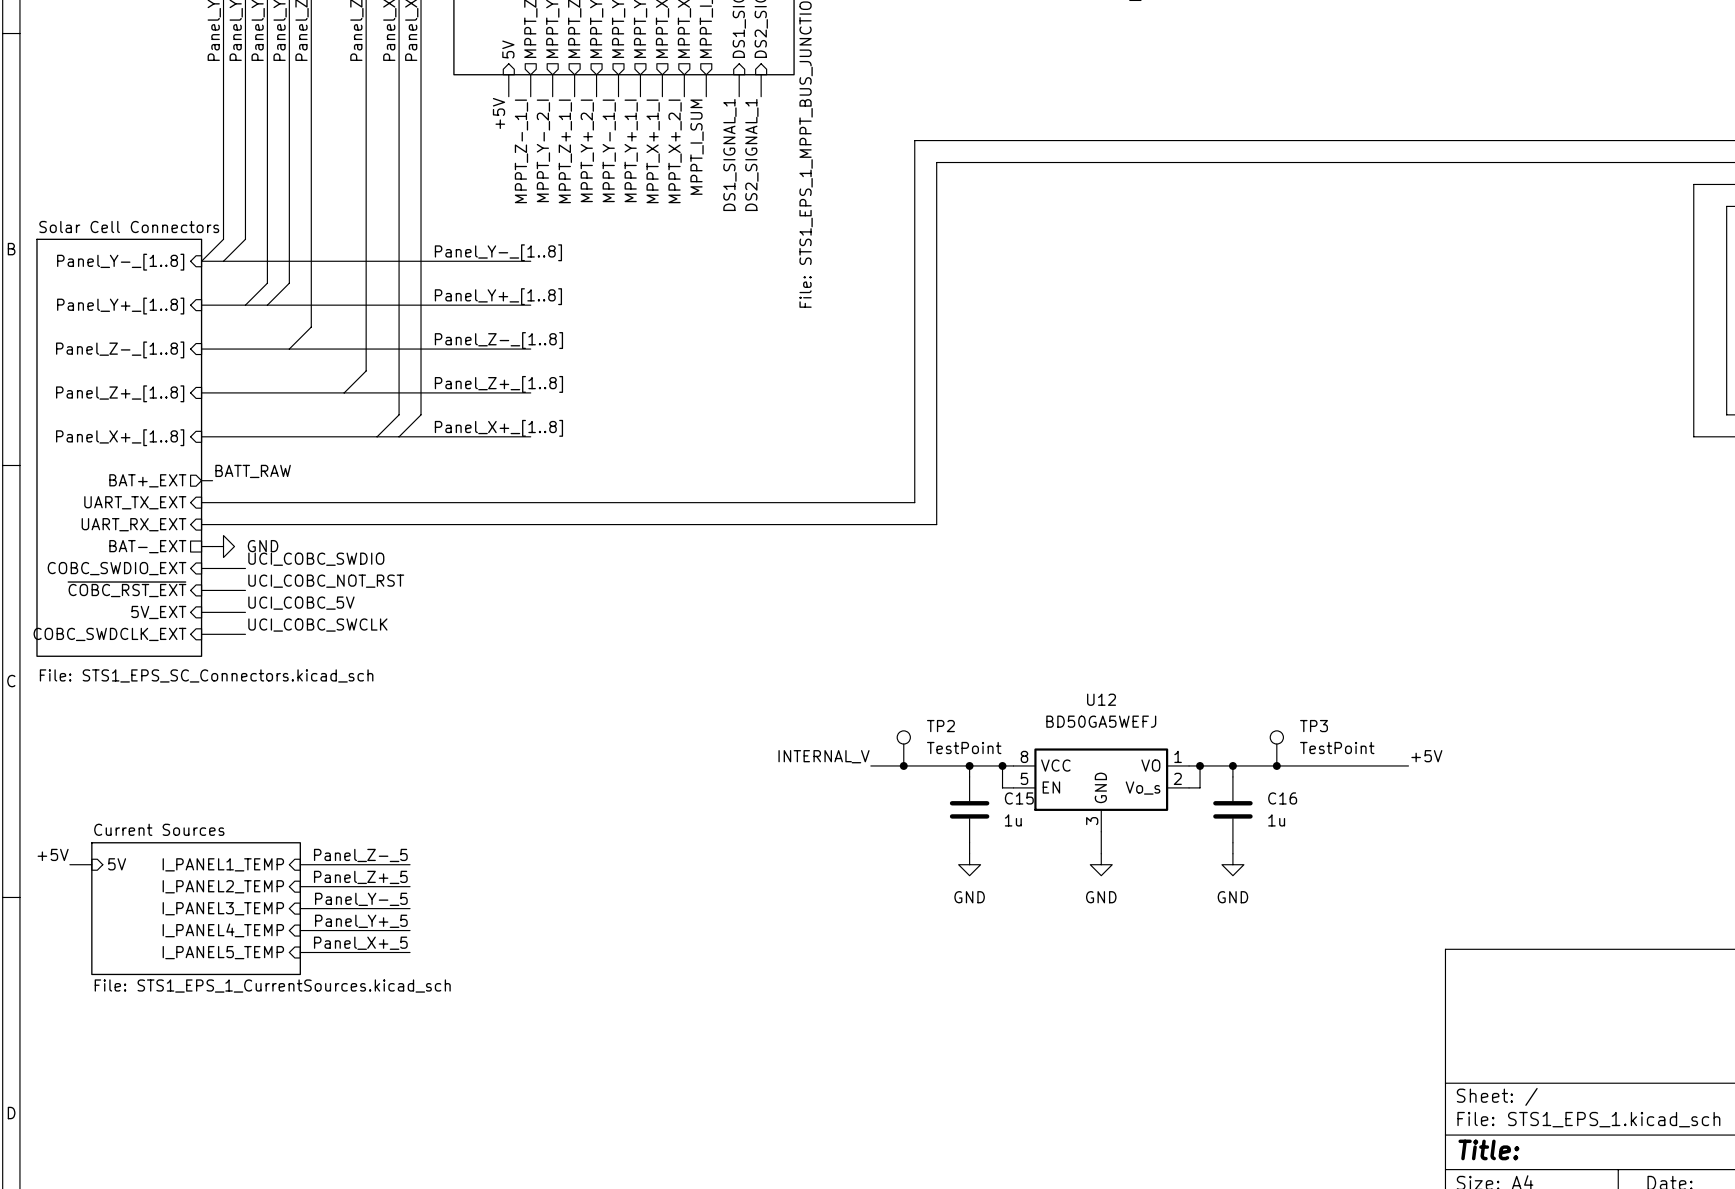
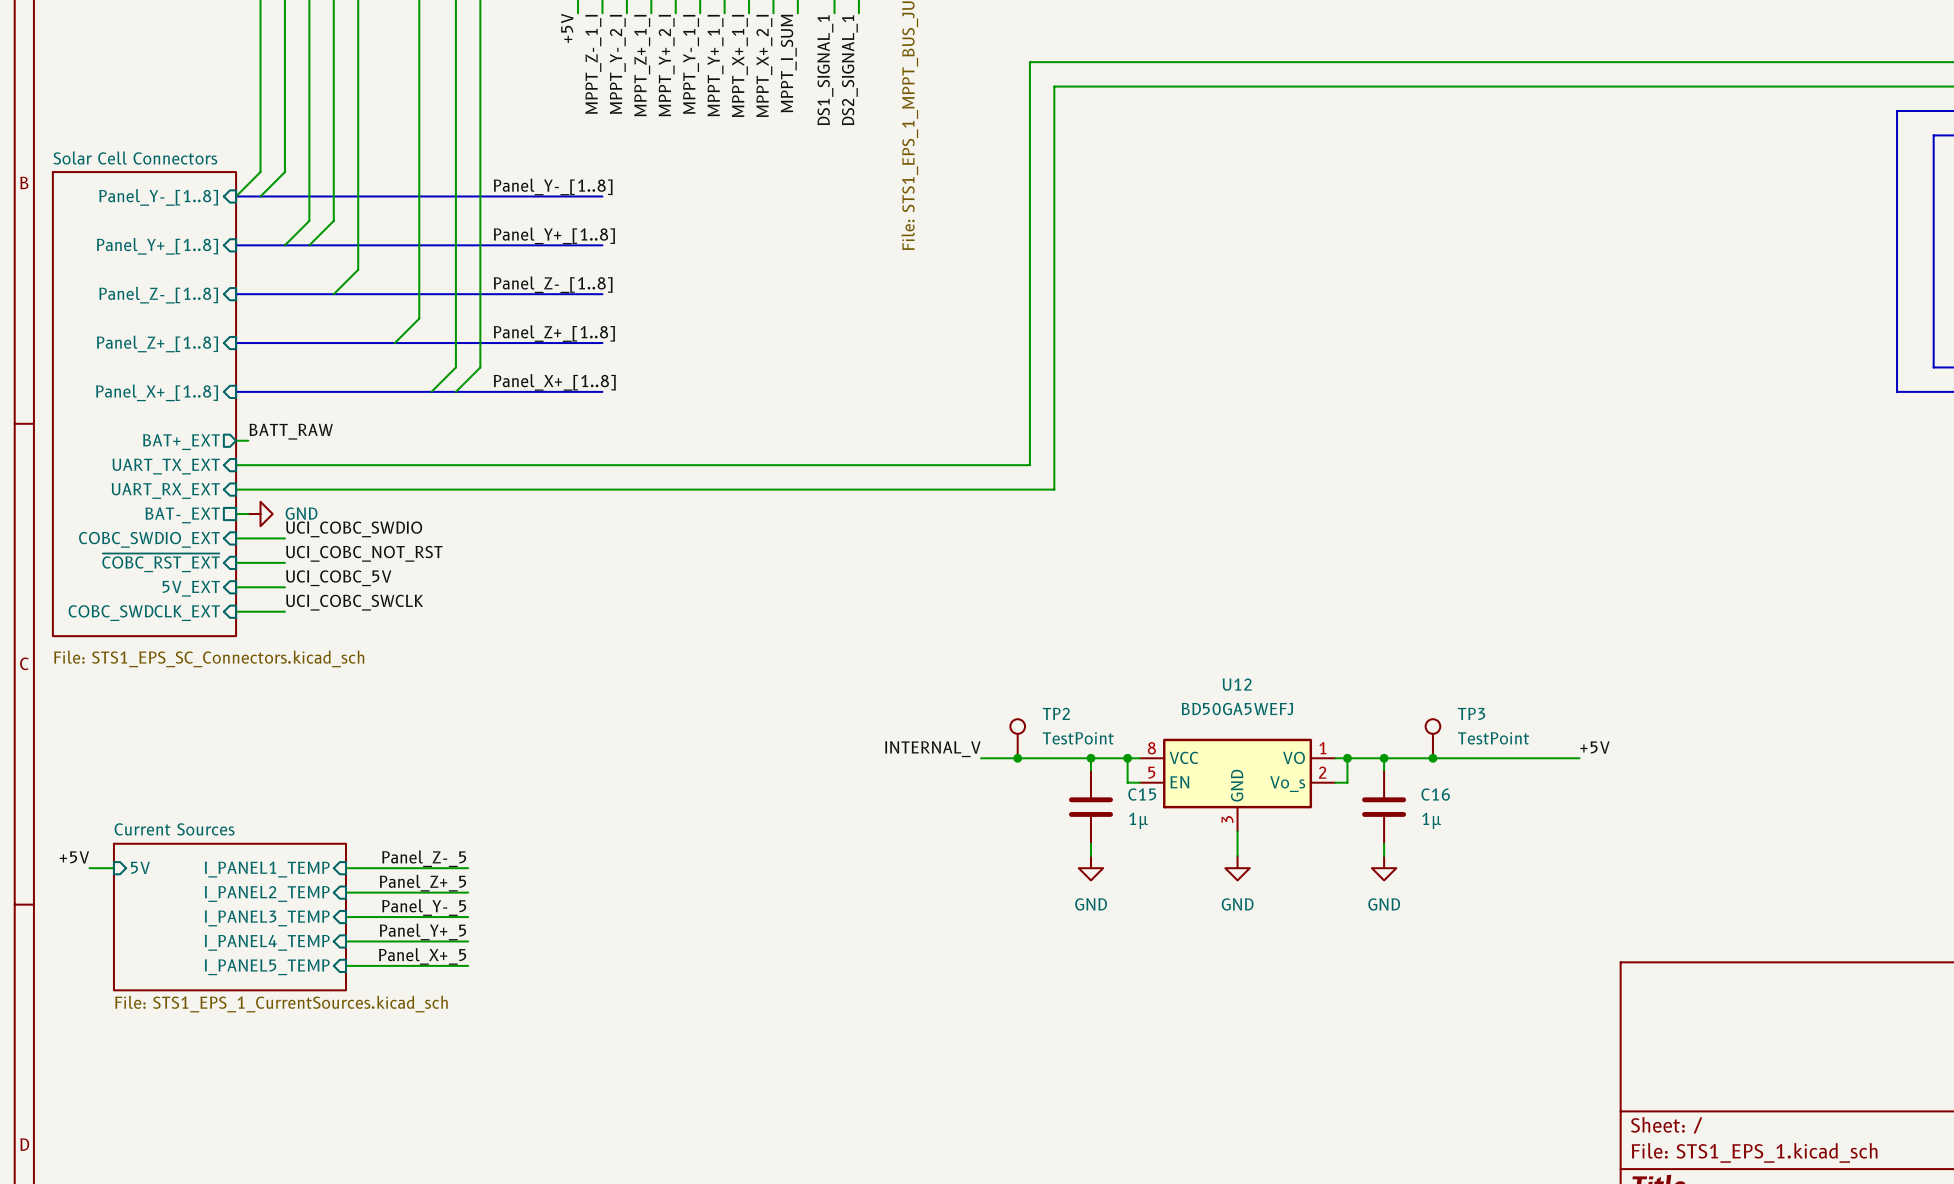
C15 value: 1u (1013, 820) -> 1µ (1138, 820)
C16 value: 1u (1276, 820) -> 1µ (1431, 820)

